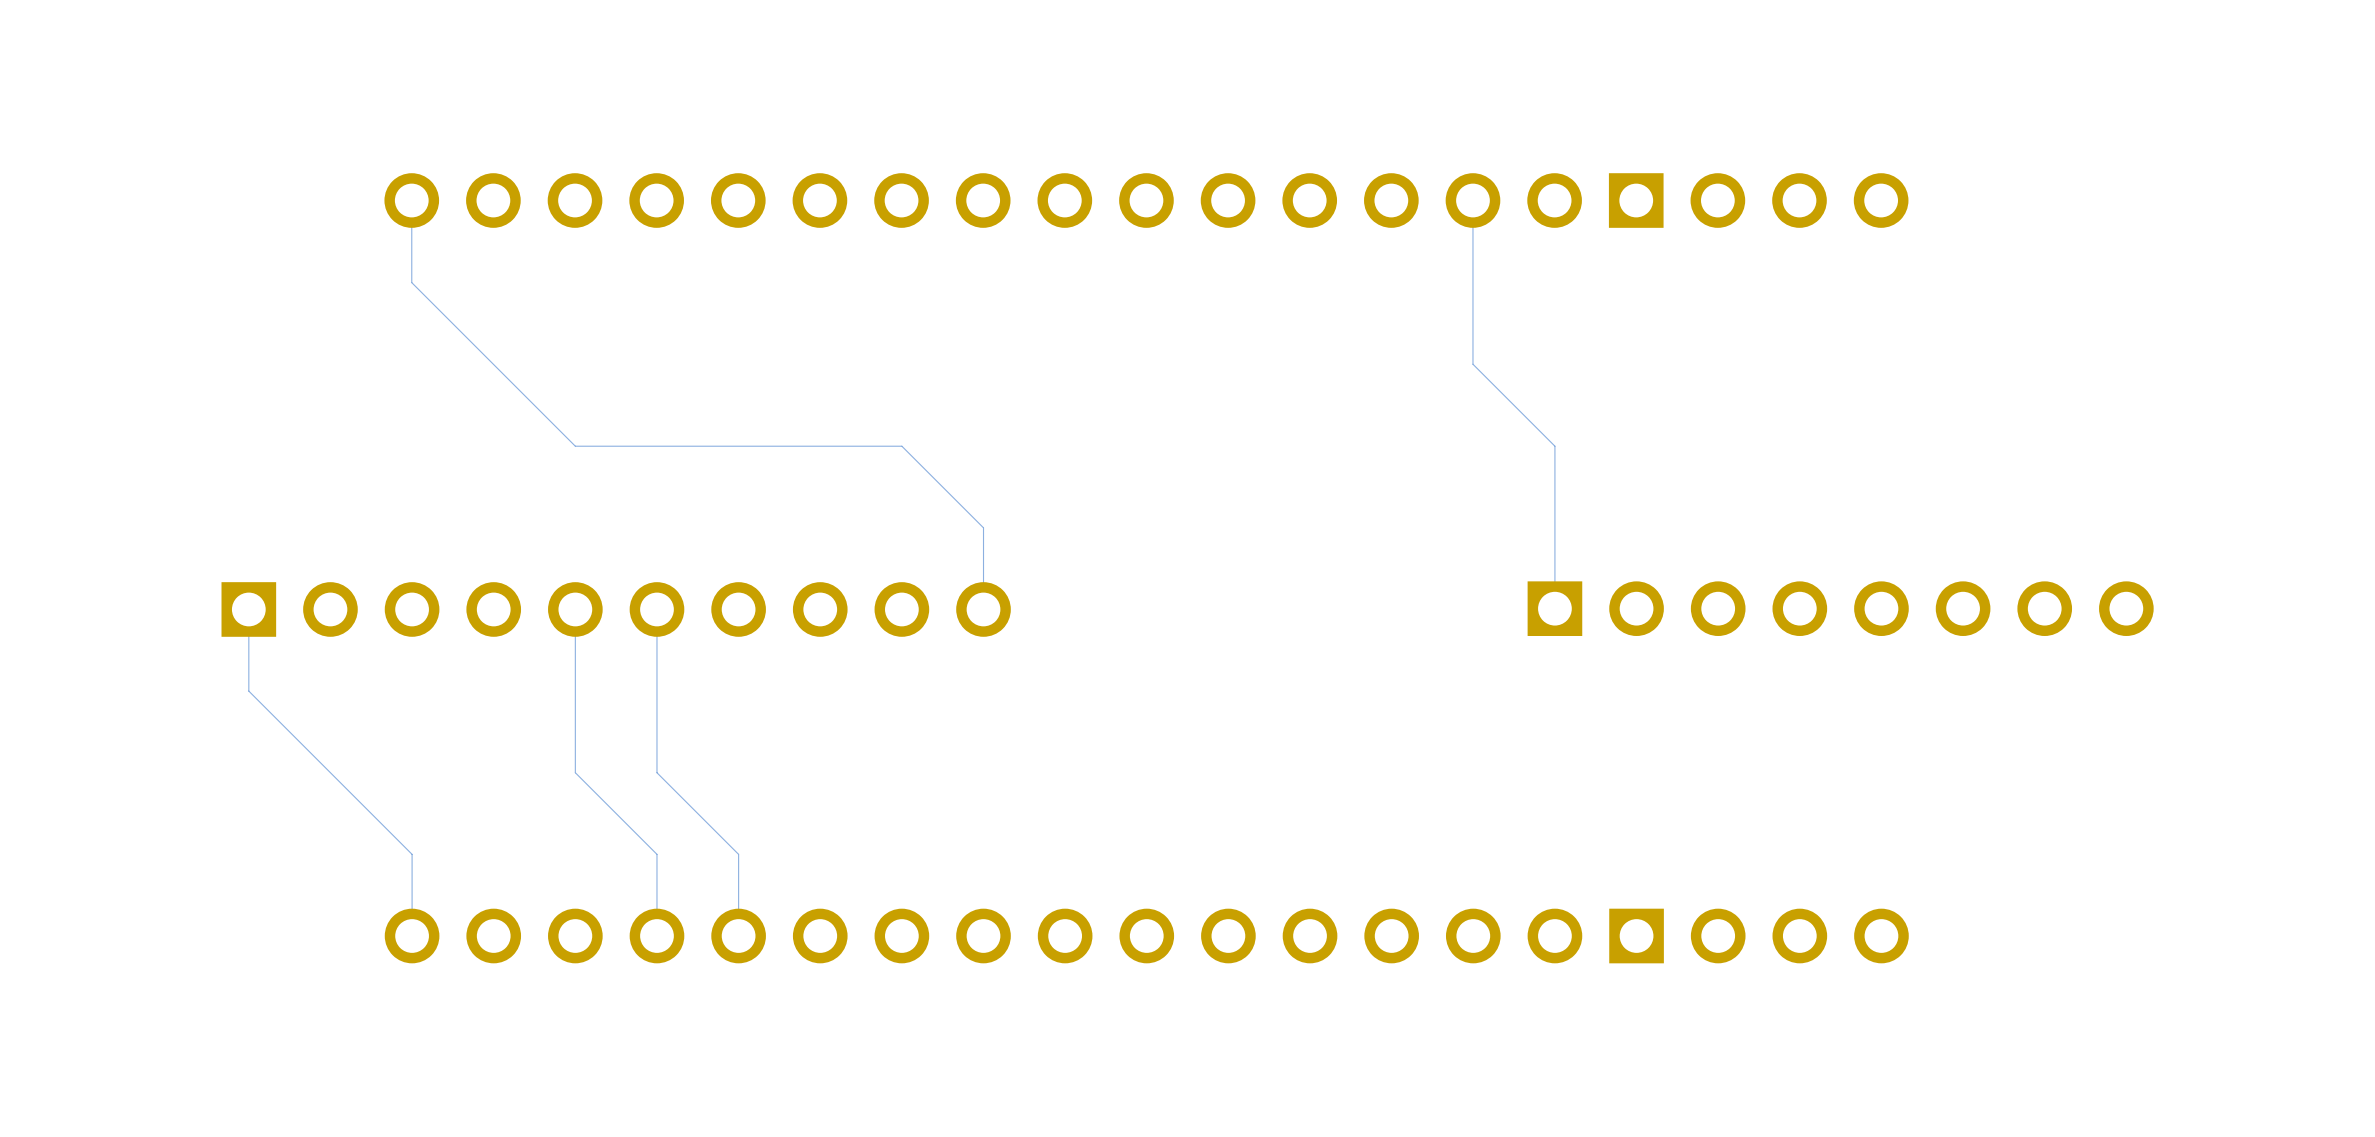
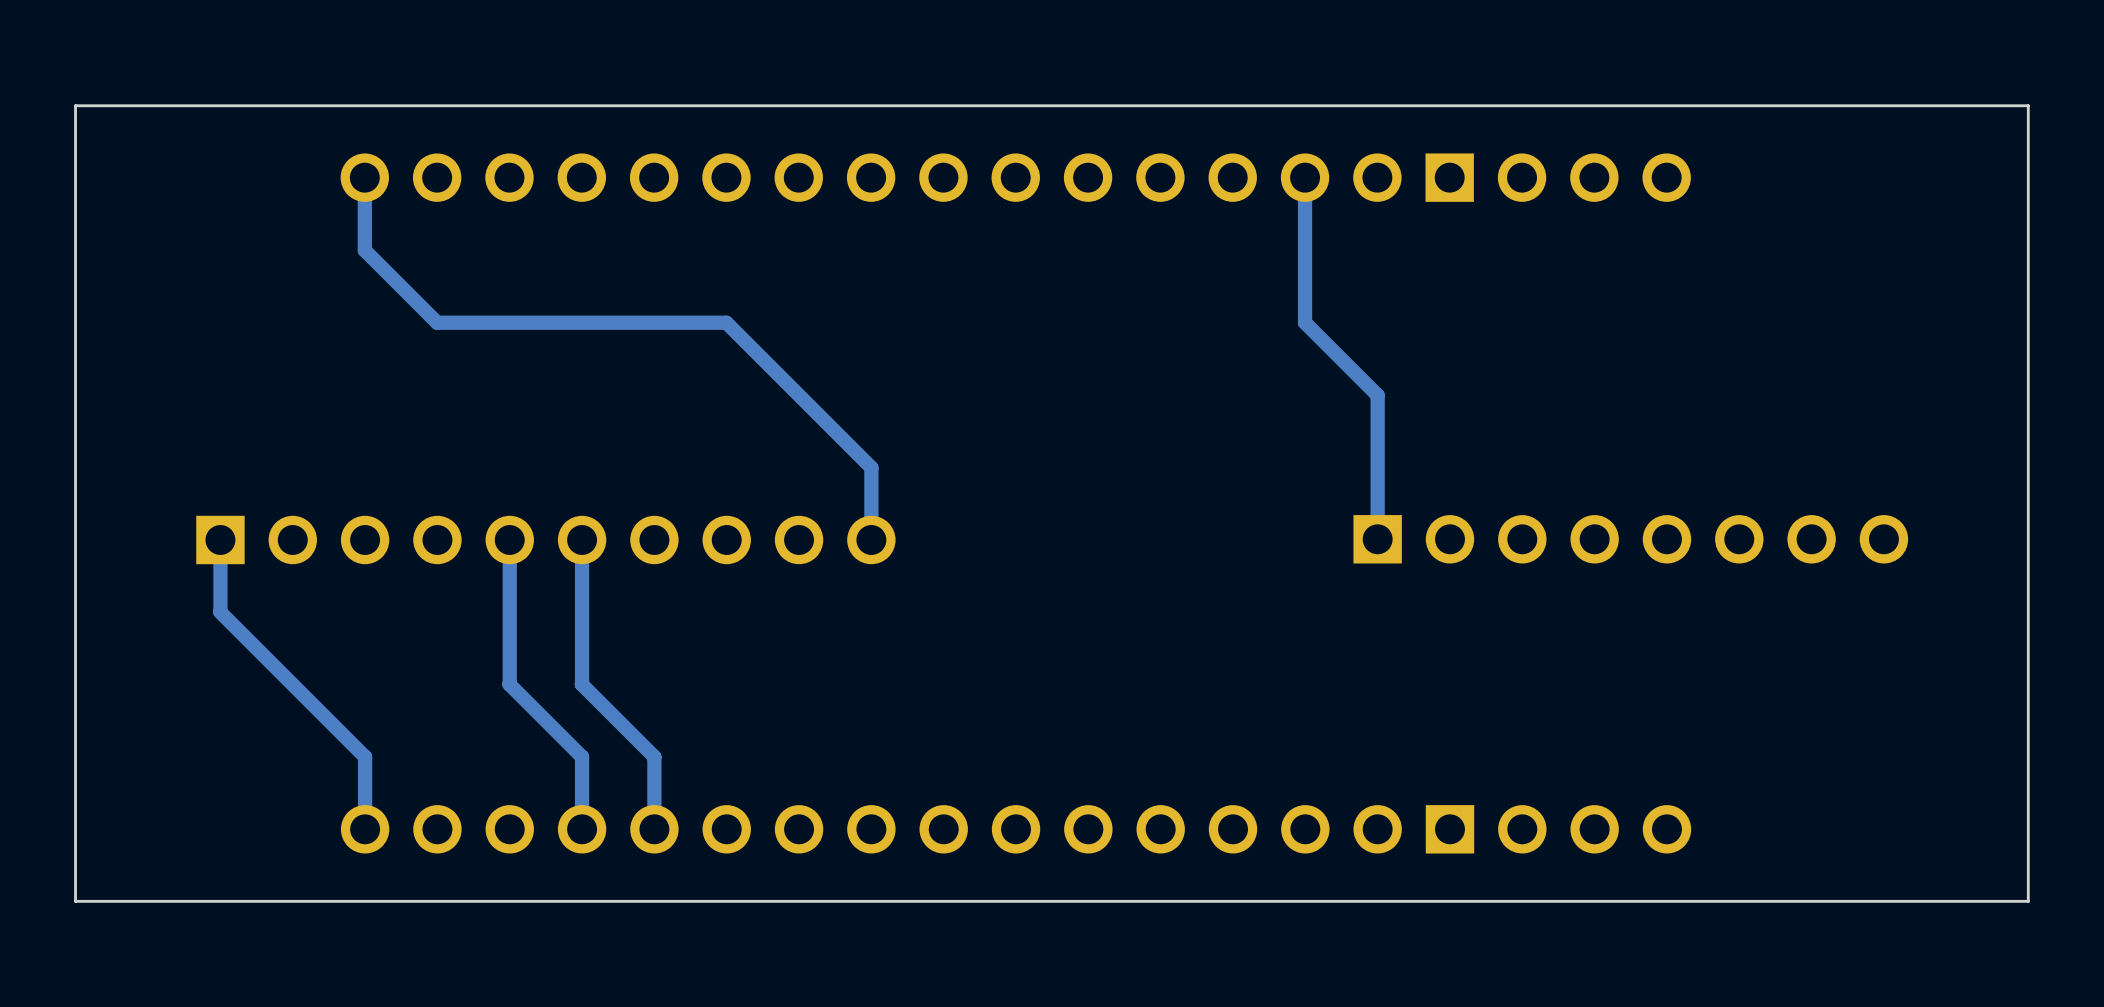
board edge: none -> (2028, 105) (75, 105) (75, 901) (2028, 901) (2028, 105)
track width: thin (411, 200) (411, 282) (493, 364) -> thick (364, 177) (364, 250) (437, 322)
track width: thin (1472, 200) (1472, 364) (1554, 446) (1554, 608) -> thick (1305, 177) (1305, 322) (1377, 395) (1377, 539)
track: (493, 364) (575, 446) (901, 446) -> (437, 322) (726, 322) (799, 395)
track width: thin (901, 446) (983, 527) (983, 609) -> thick (799, 395) (871, 467) (871, 540)
track width: thin (248, 609) (248, 690) -> thick (220, 540) (220, 611)
track width: thin (575, 609) (575, 772) (656, 854) (656, 936) -> thick (509, 540) (509, 684) (582, 756) (582, 829)
track width: thin (656, 609) (656, 772) (738, 854) (738, 936) -> thick (582, 540) (582, 684) (654, 756) (654, 829)
track width: thin (248, 691) (412, 854) (412, 936) -> thick (220, 612) (365, 756) (365, 829)

